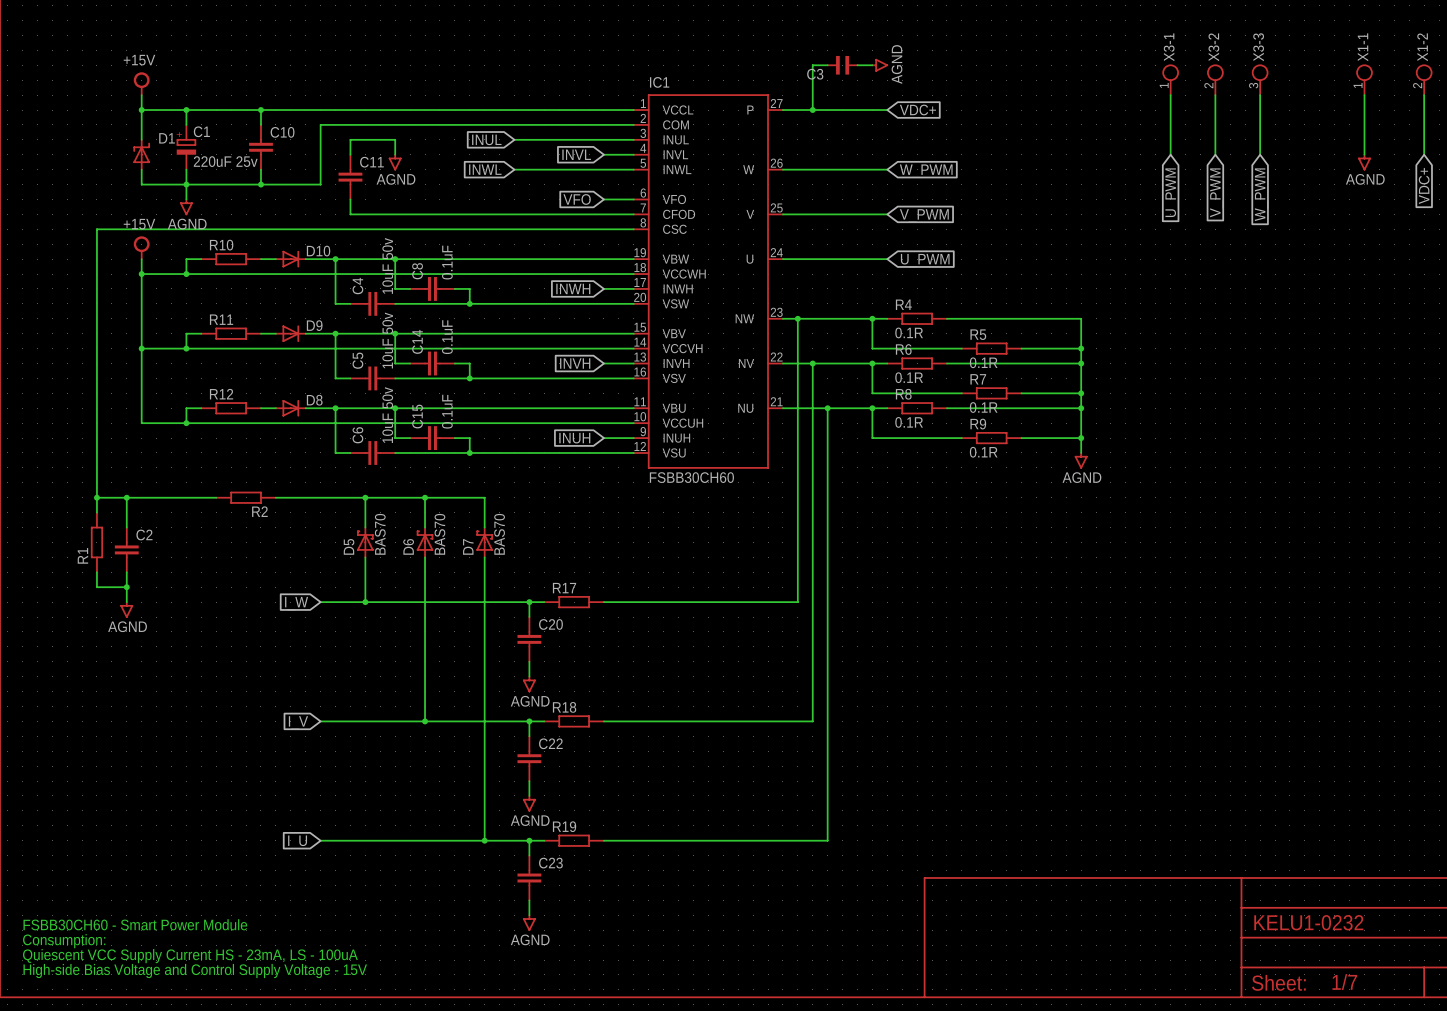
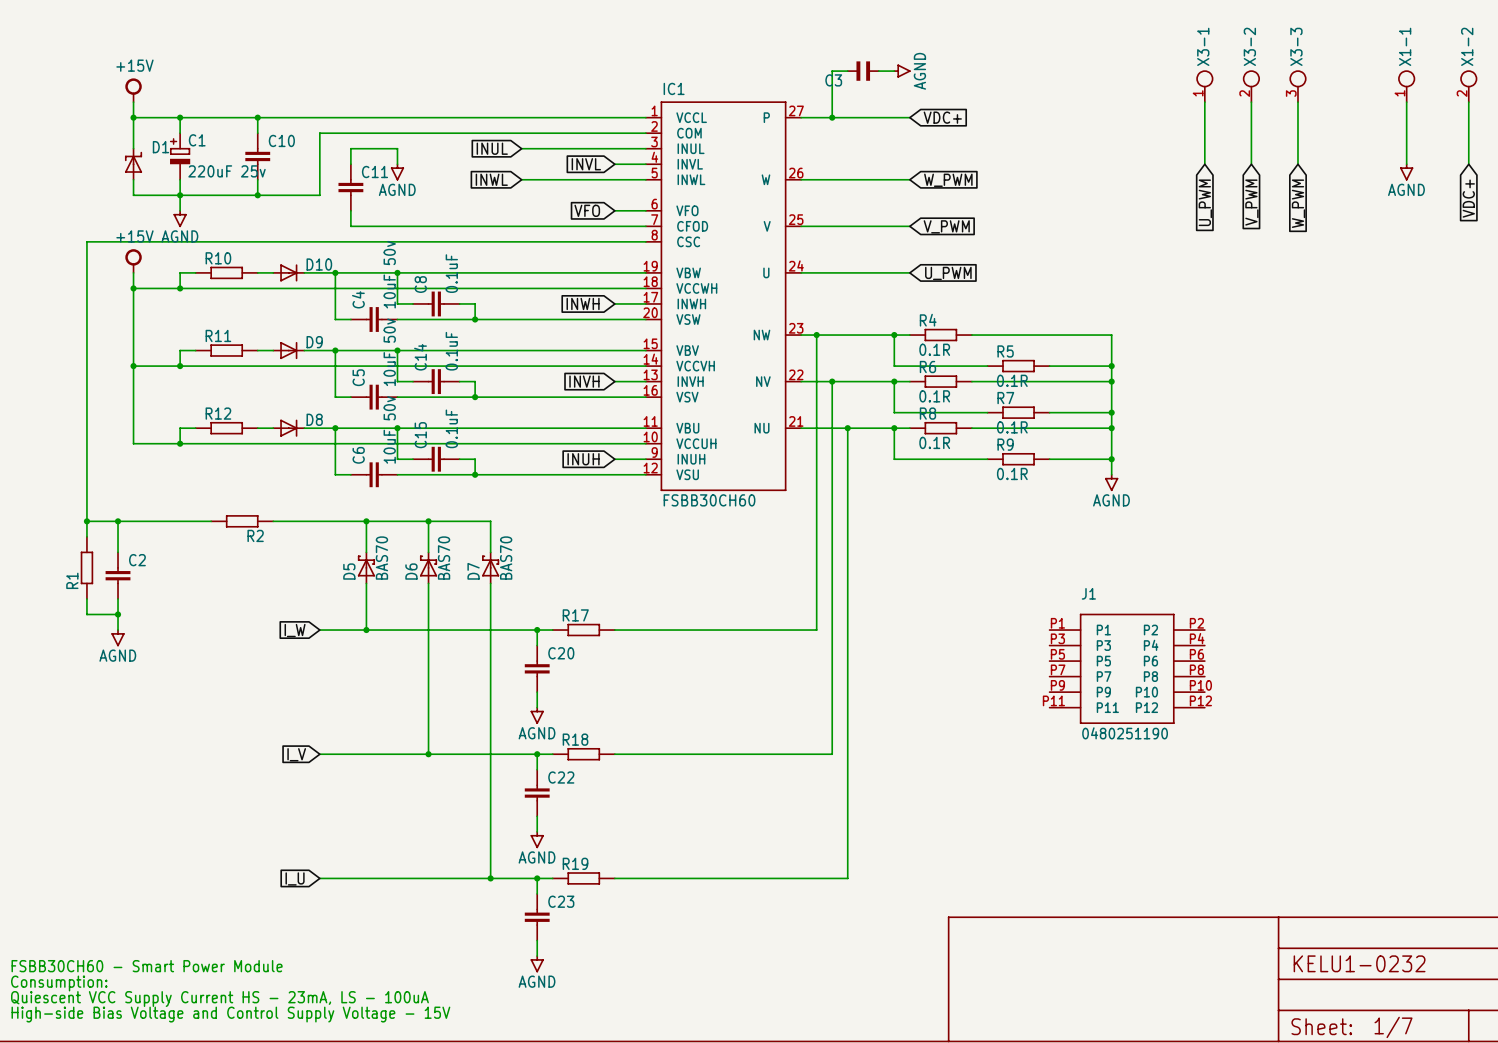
J1: none -> 0480251190 (1127, 668)

